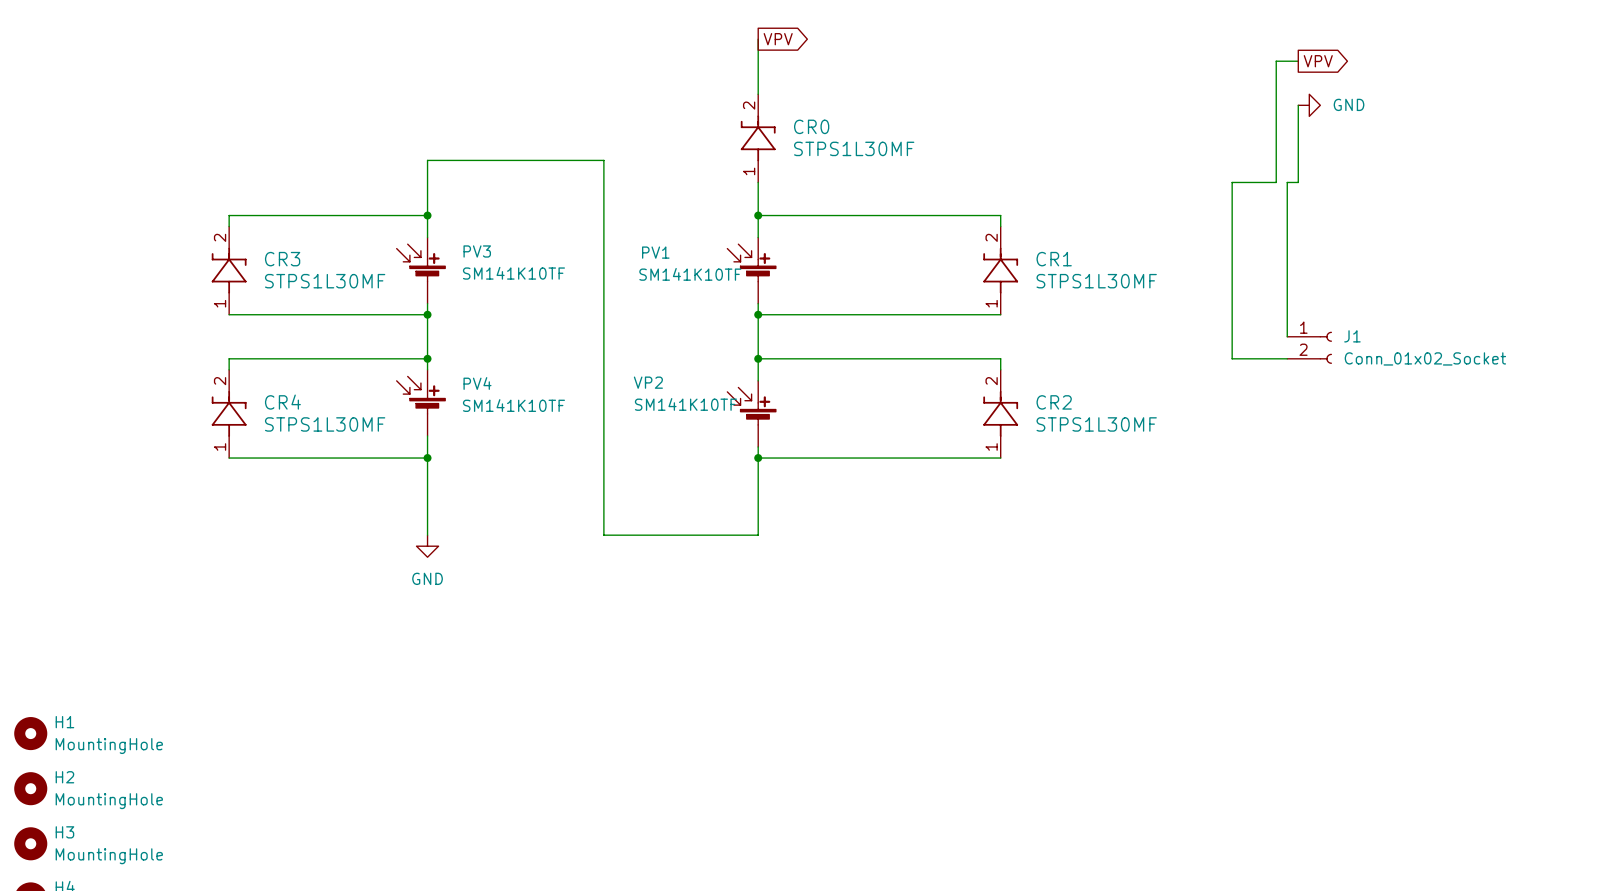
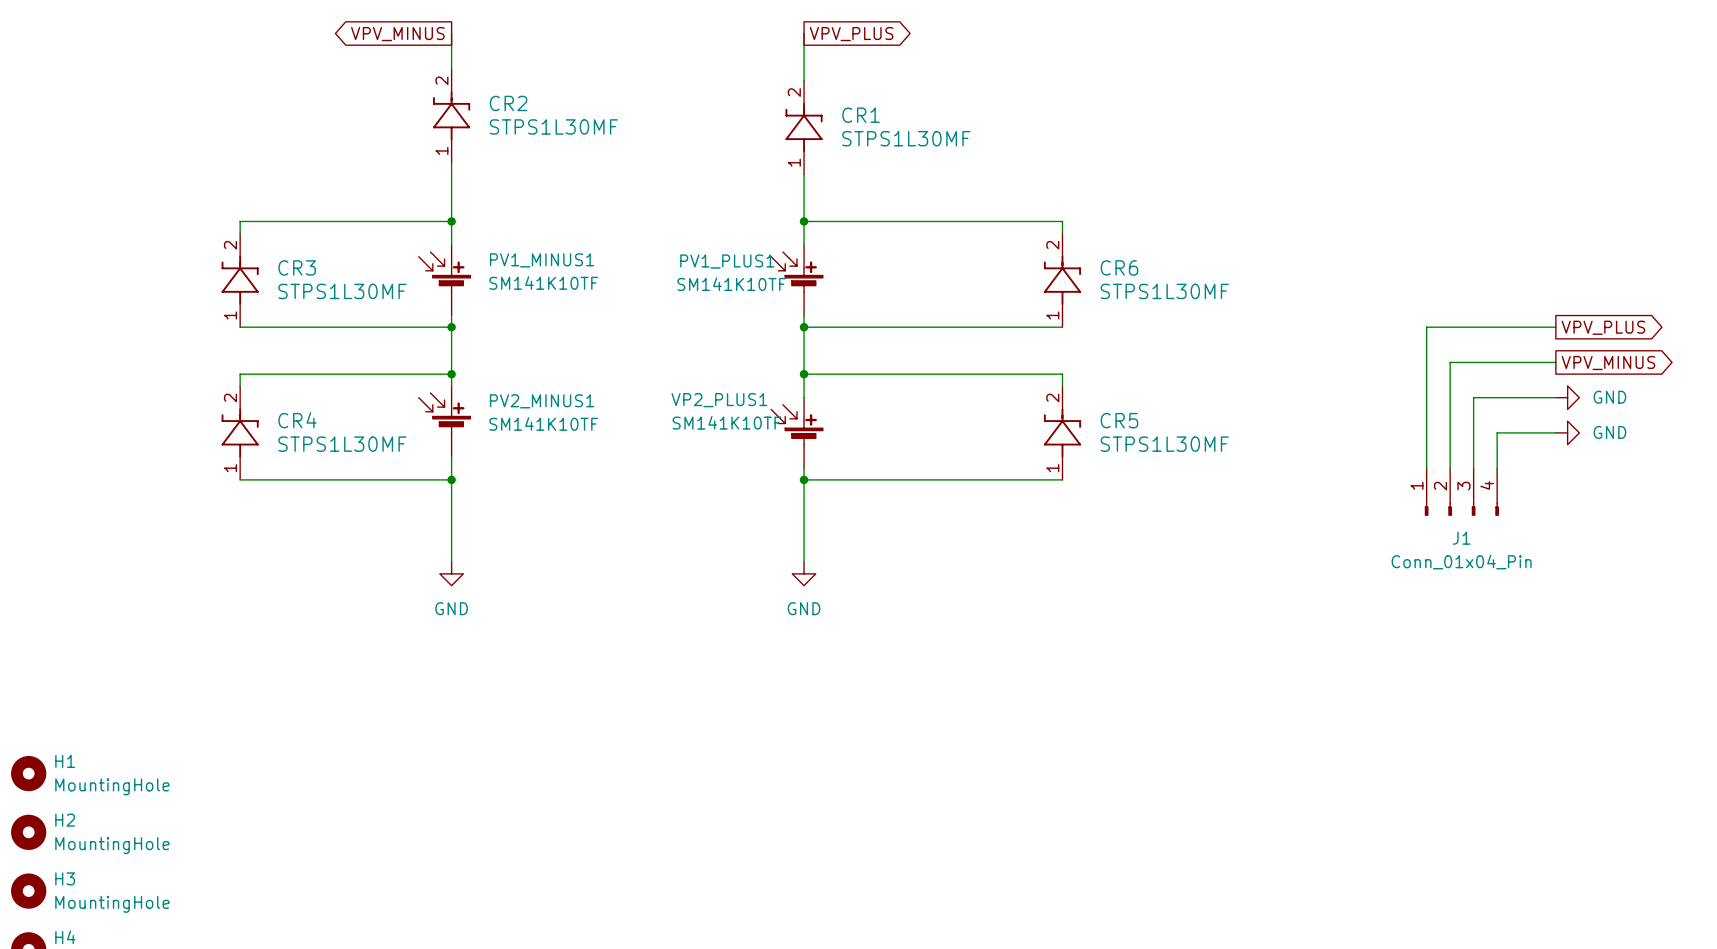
global label: none -> VPV_MINUS (397, 34)
wire: none -> (451, 33) (451, 68)
global label: VPV (778, 39) -> VPV_PLUS (851, 34)
wire: (1298, 61) (1276, 61) (1276, 182) (1232, 182) (1232, 358) (1287, 358) -> none
global label: VPV (1318, 61) -> none
wire: (1298, 105) (1298, 182) (1287, 182) (1287, 336) -> none
power symbol: GND (1309, 105) -> none
CR2: none -> STPS1L30MF (451, 115)
CR1: none -> STPS1L30MF (804, 127)
CR0: STPS1L30MF (758, 138) -> none
wire: (427, 160) (603, 160) (603, 535) (758, 535) -> none
PV3 name: PV3 (477, 251) -> PV1_MINUS1 (542, 260)
PV1 name: PV1 (655, 252) -> PV1_PLUS1 (727, 261)
CR1 name: CR1 (1054, 259) -> CR6 (1119, 267)
wire: none -> (1555, 327) (1426, 327) (1426, 468)
global label: none -> VPV_PLUS (1603, 327)
J1 symbol: [1287, 331, 1333, 364] -> [1424, 468, 1500, 516]
J1 name position: J1 (1352, 336) -> J1 (1461, 538)
wire: none -> (1555, 362) (1450, 362) (1450, 468)
global label: none -> VPV_MINUS (1608, 363)
J1 value: Conn_01x02_Socket (1425, 358) -> Conn_01x04_Pin (1461, 561)
wire: none -> (1555, 397) (1473, 397) (1473, 468)
power symbol: none -> GND (1567, 397)
VP2 name: VP2 (648, 382) -> VP2_PLUS1 (719, 400)
PV4 name: PV4 (477, 383) -> PV2_MINUS1 (542, 401)
CR2 name: CR2 (1054, 402) -> CR5 (1119, 420)
wire: none -> (1555, 432) (1497, 432) (1497, 468)
power symbol: none -> GND (1567, 432)
power symbol: none -> GND (804, 573)

